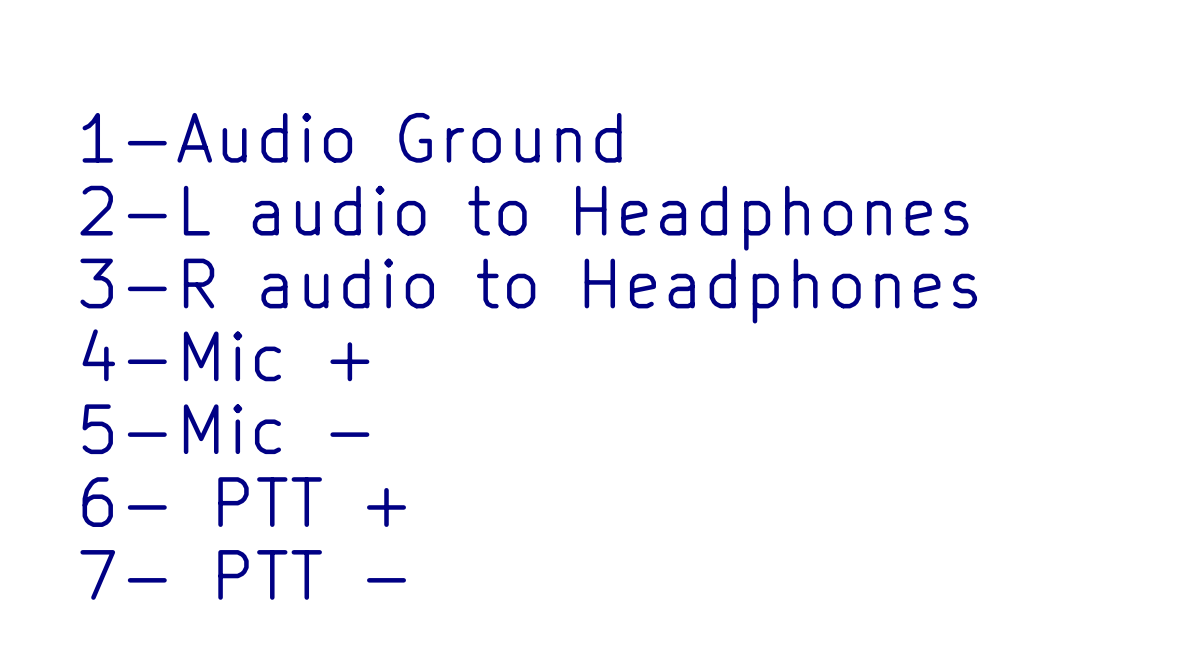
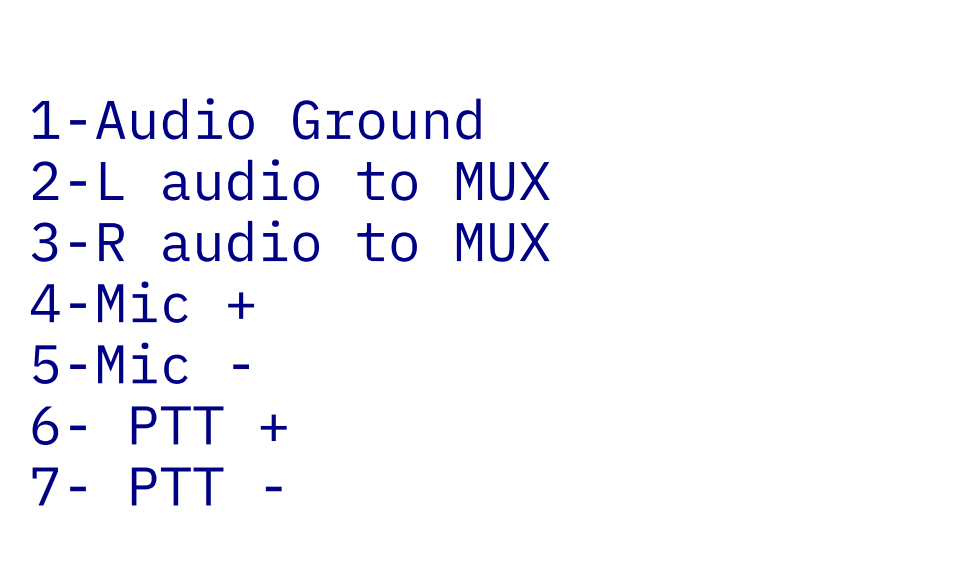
text: 2-L audio to Headphones (524, 218) -> 2-L audio to MUX (291, 179)
text: 3-R audio to Headphones (528, 291) -> 3-R audio to MUX (290, 241)

